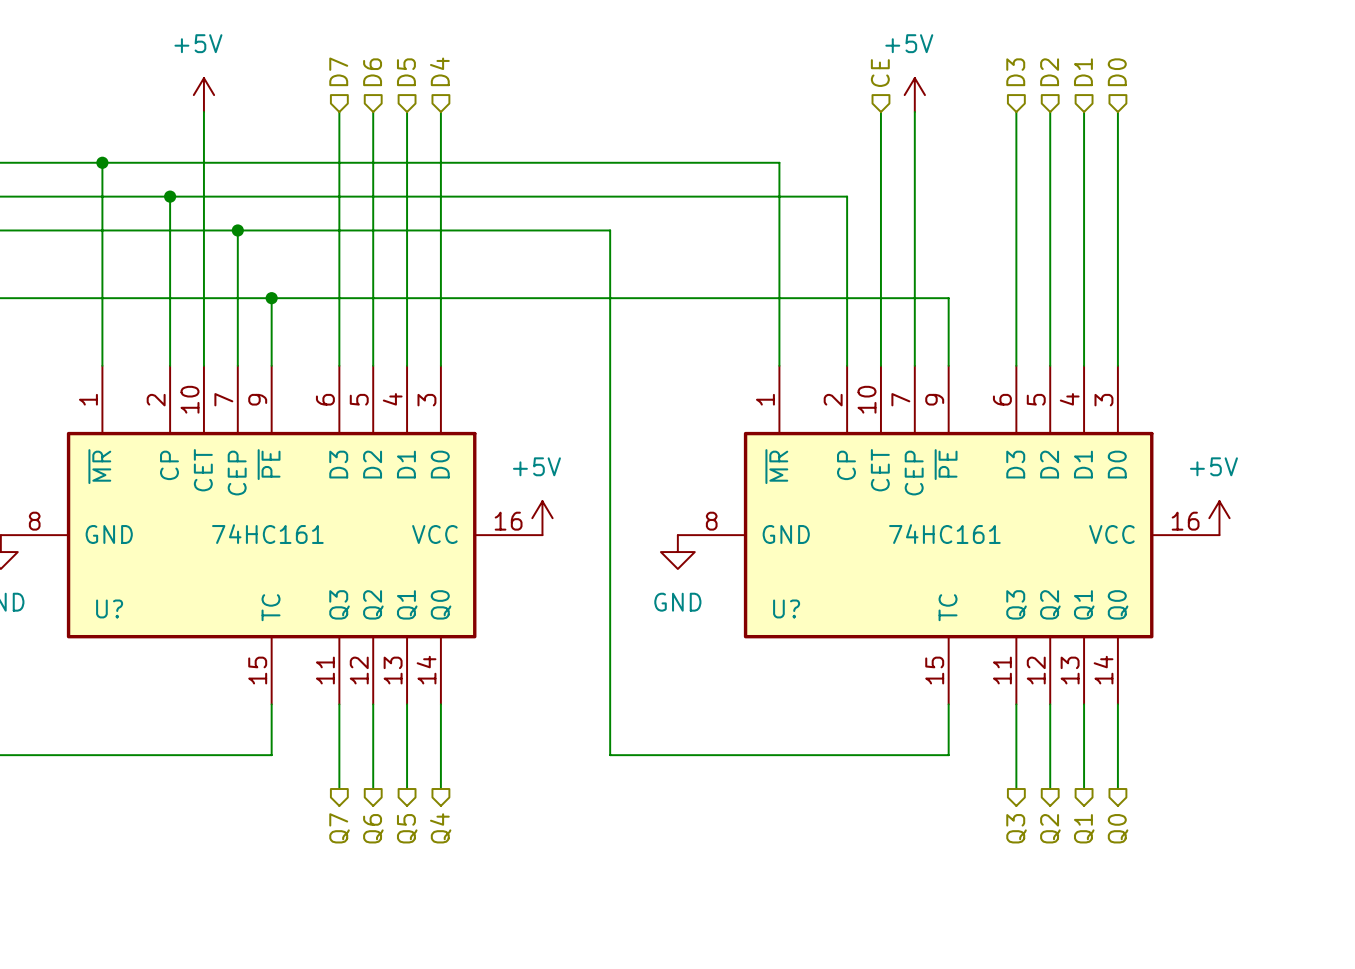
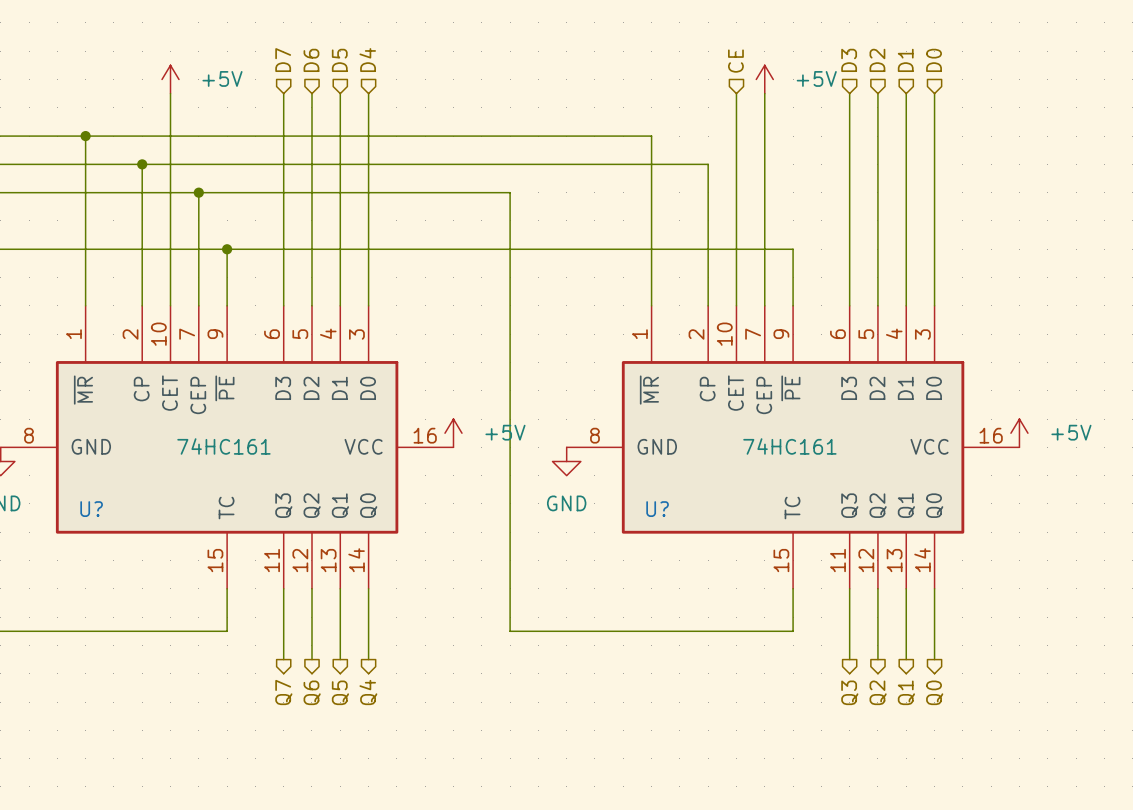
power symbol text position: +5V (198, 43) -> +5V (222, 78)
power symbol text position: +5V (909, 43) -> +5V (816, 78)
power symbol text position: +5V (536, 466) -> +5V (505, 432)
power symbol text position: +5V (1213, 466) -> +5V (1071, 432)

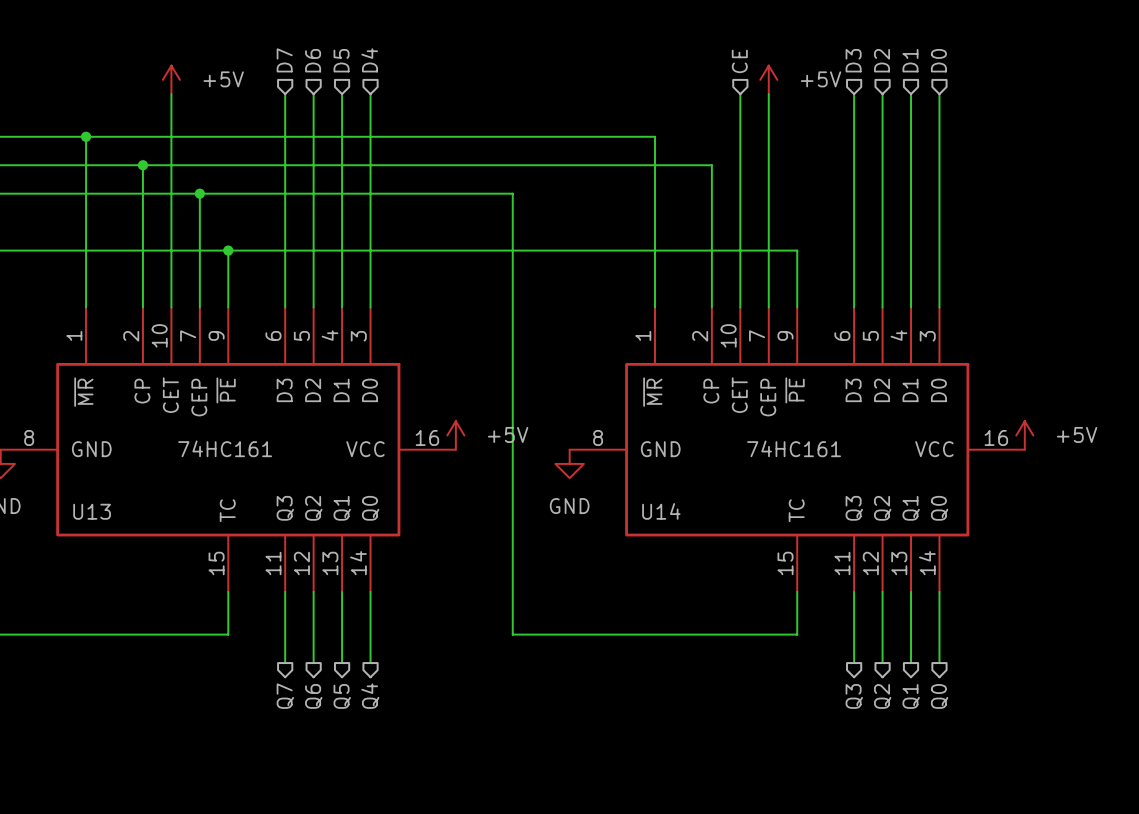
U? name: U? (91, 509) -> U13 (92, 511)
U? name: U? (657, 509) -> U14 (661, 511)

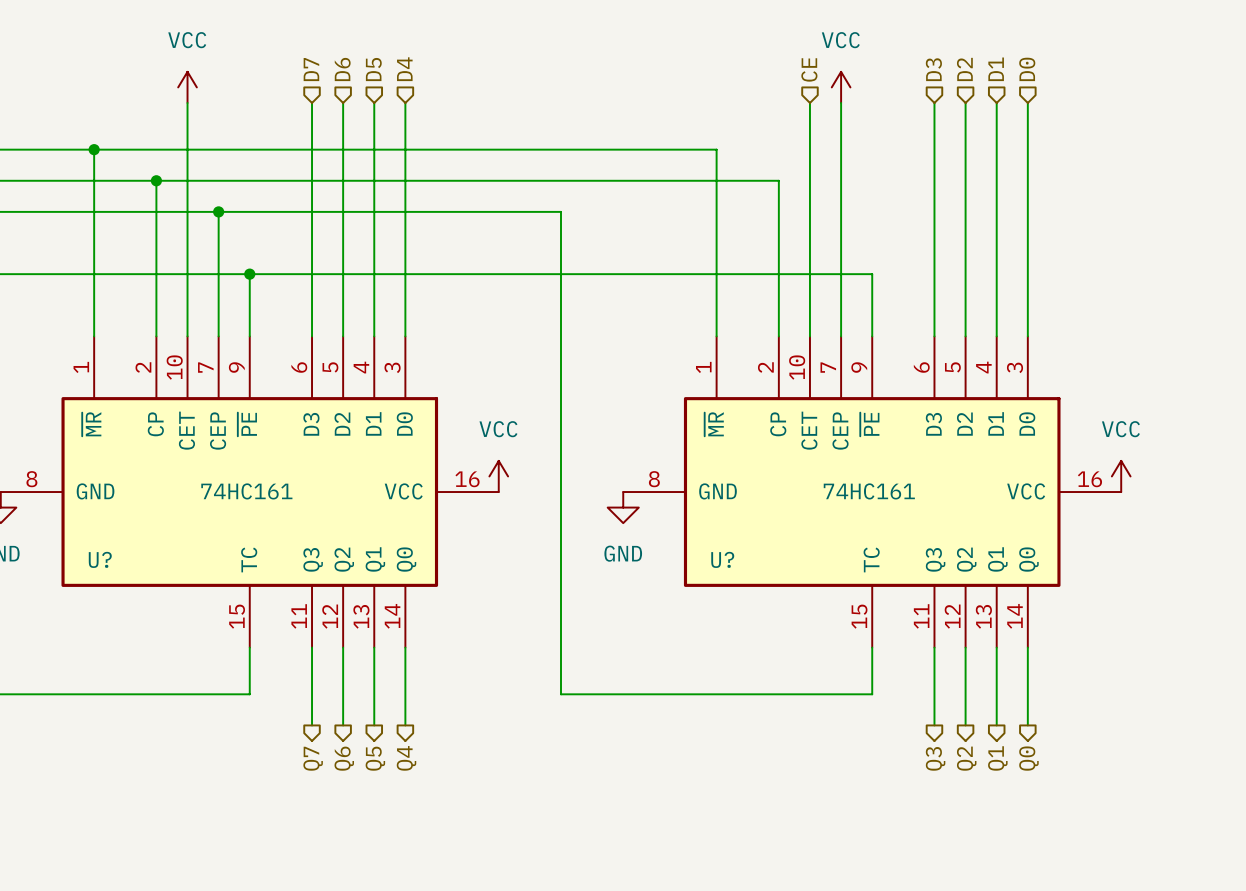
power symbol: +5V (171, 79) -> VCC (187, 87)
power symbol: +5V (768, 79) -> VCC (841, 87)
power symbol: +5V (455, 435) -> VCC (498, 476)
power symbol: +5V (1024, 435) -> VCC (1121, 476)
U13 name: U13 (92, 511) -> U? (100, 559)
U14 name: U14 (661, 511) -> U? (722, 559)

